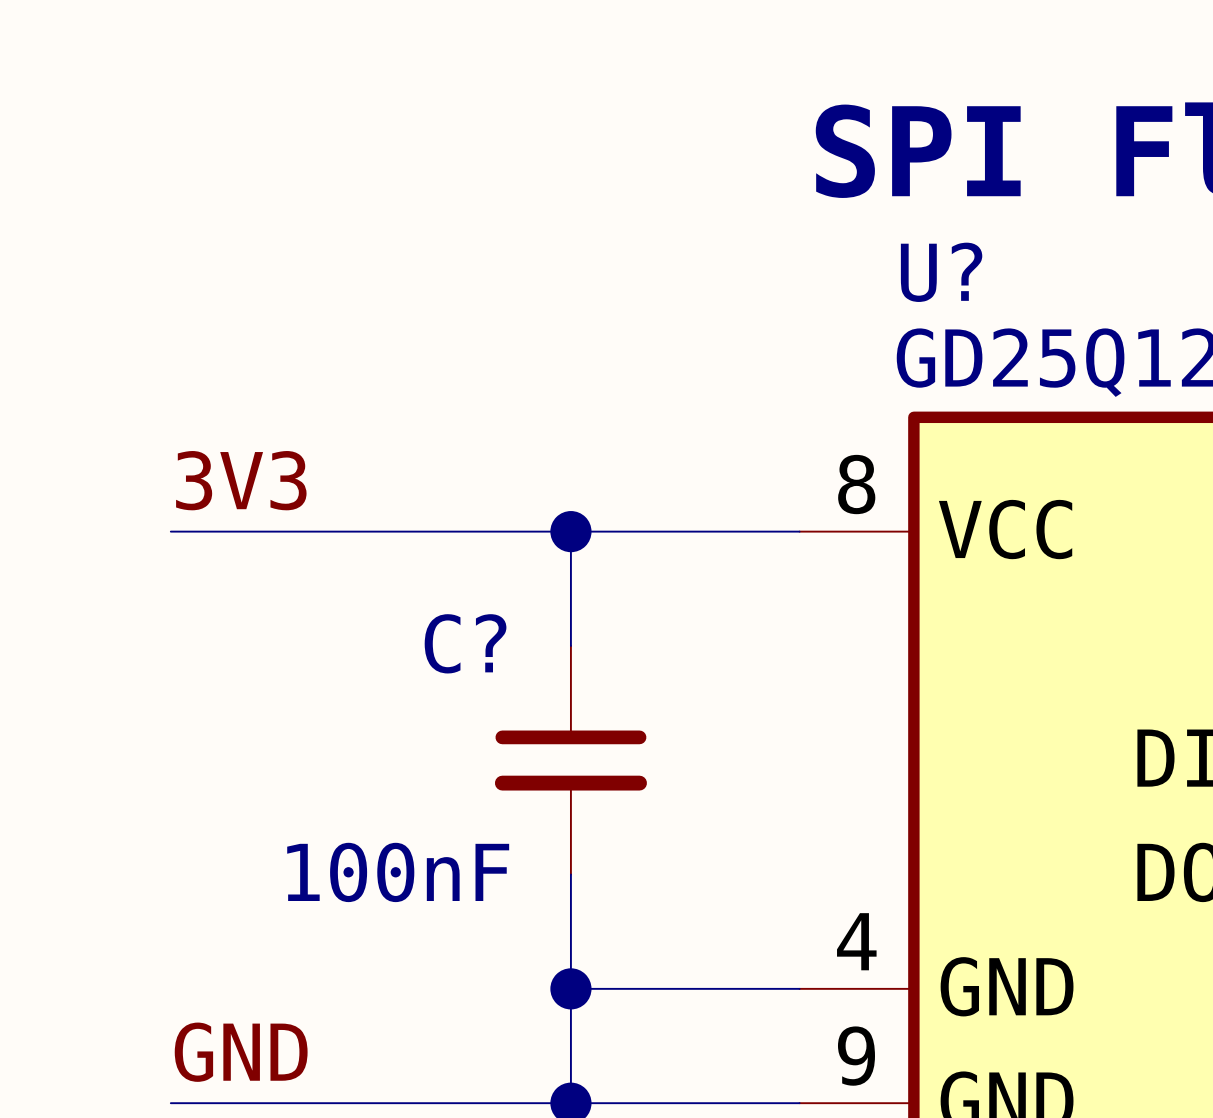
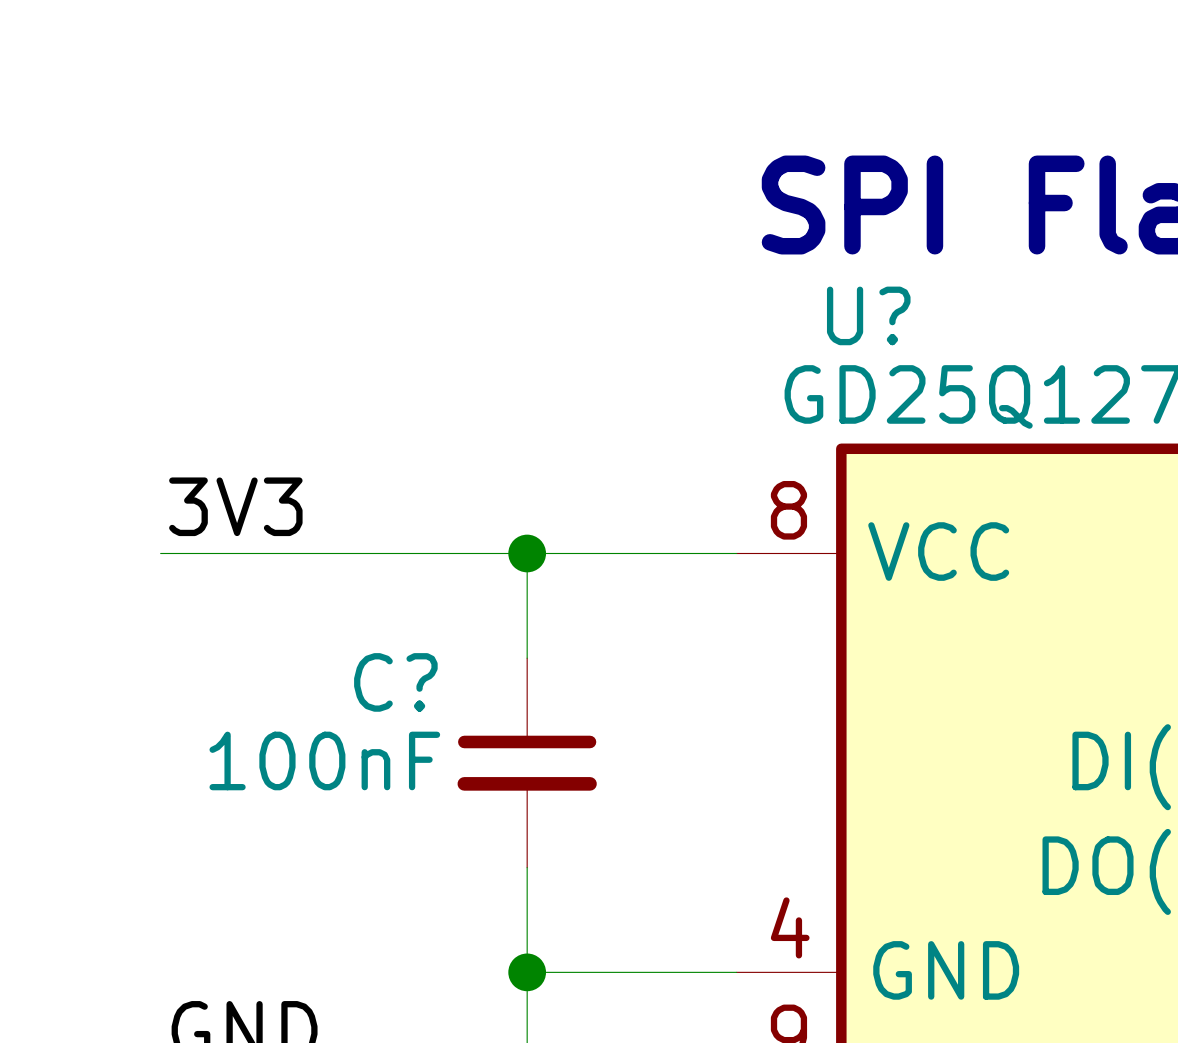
C? name position: C? (465, 643) -> C? (395, 682)
C? value position: 100nF (398, 872) -> 100nF (324, 760)

